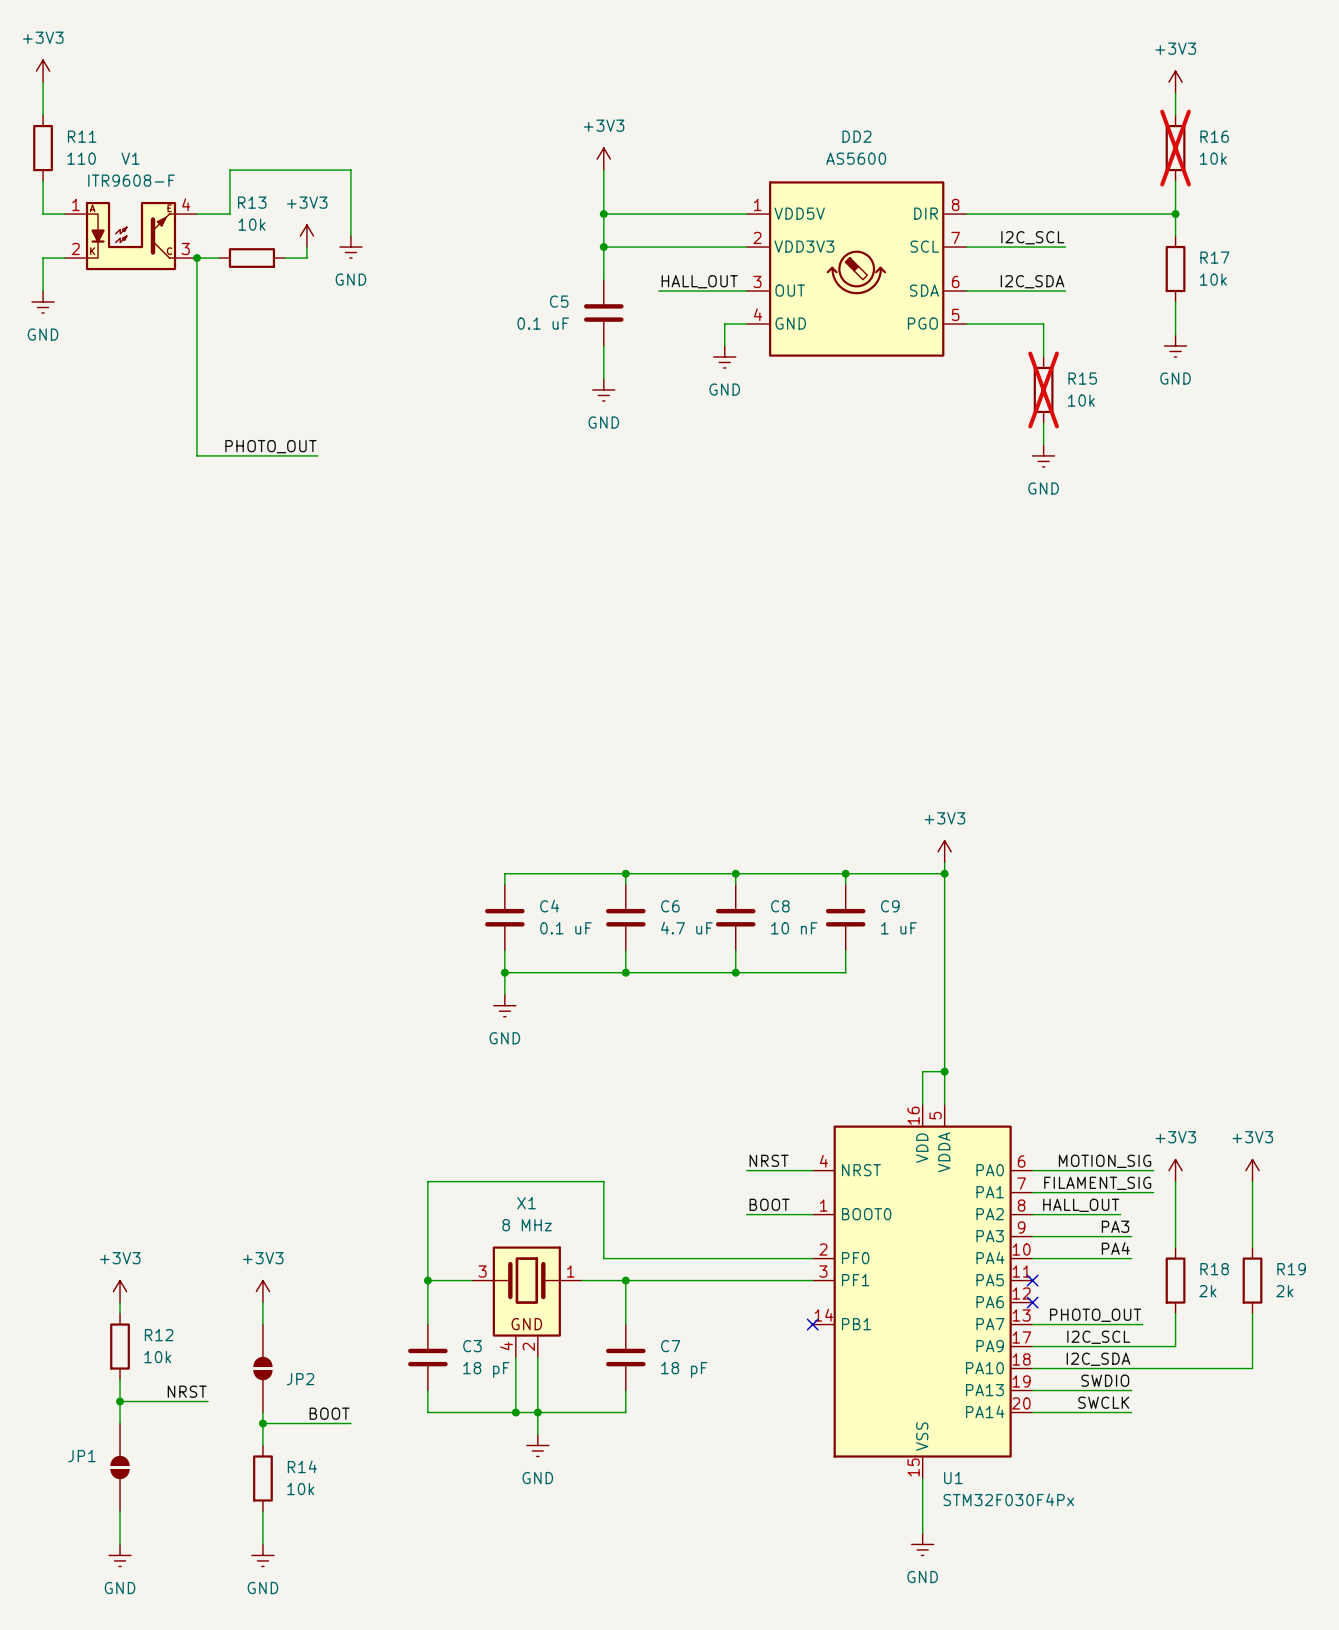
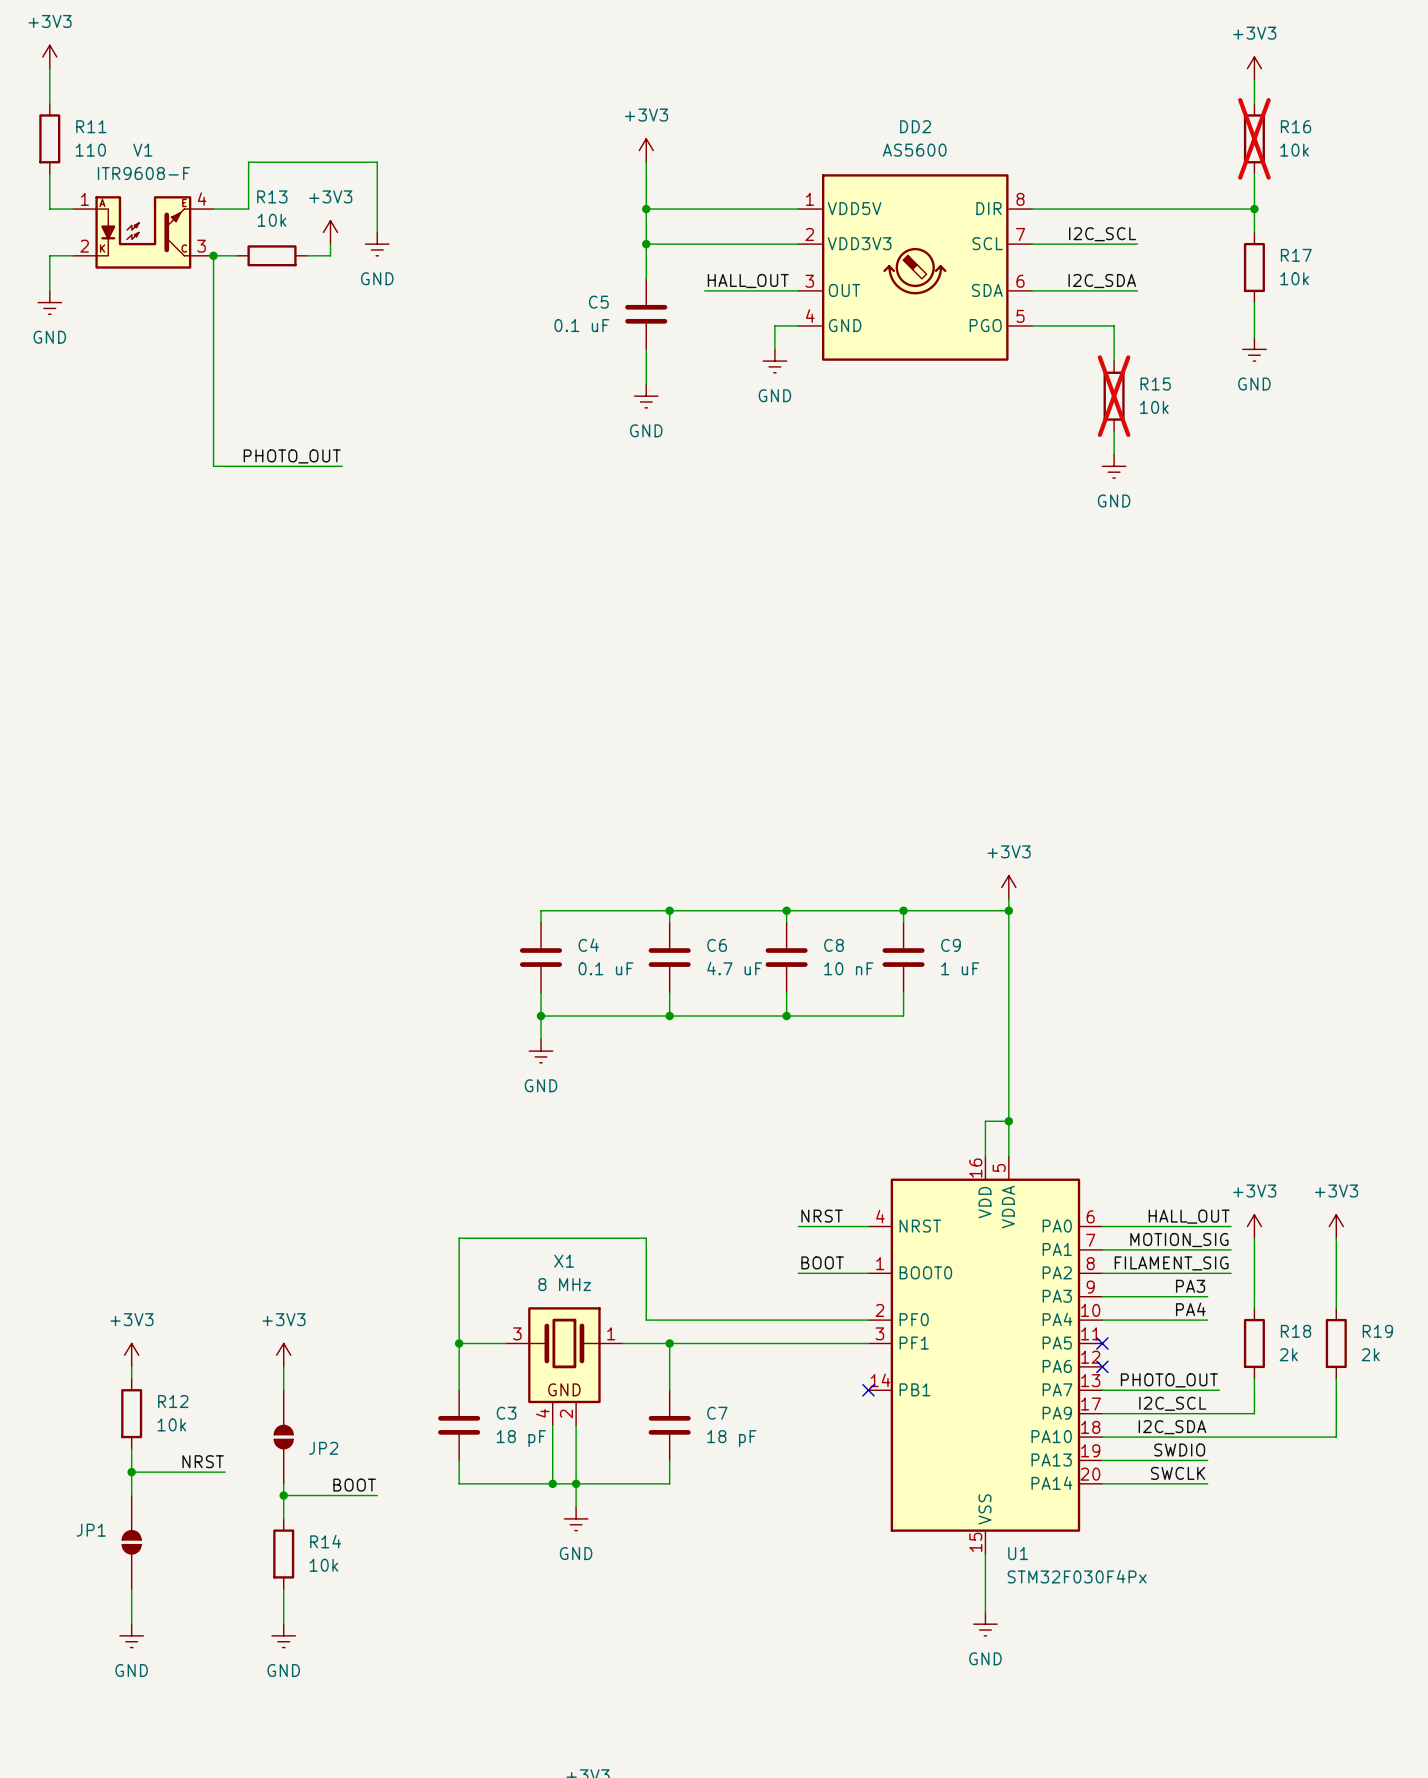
label: MOTION_SIG (1105, 1161) -> HALL_OUT (1189, 1216)
label: FILAMENT_SIG (1097, 1183) -> MOTION_SIG (1179, 1240)
label: HALL_OUT (1081, 1205) -> none
label: none -> FILAMENT_SIG (1171, 1263)
wire: none -> (1195, 1273) (1231, 1273)

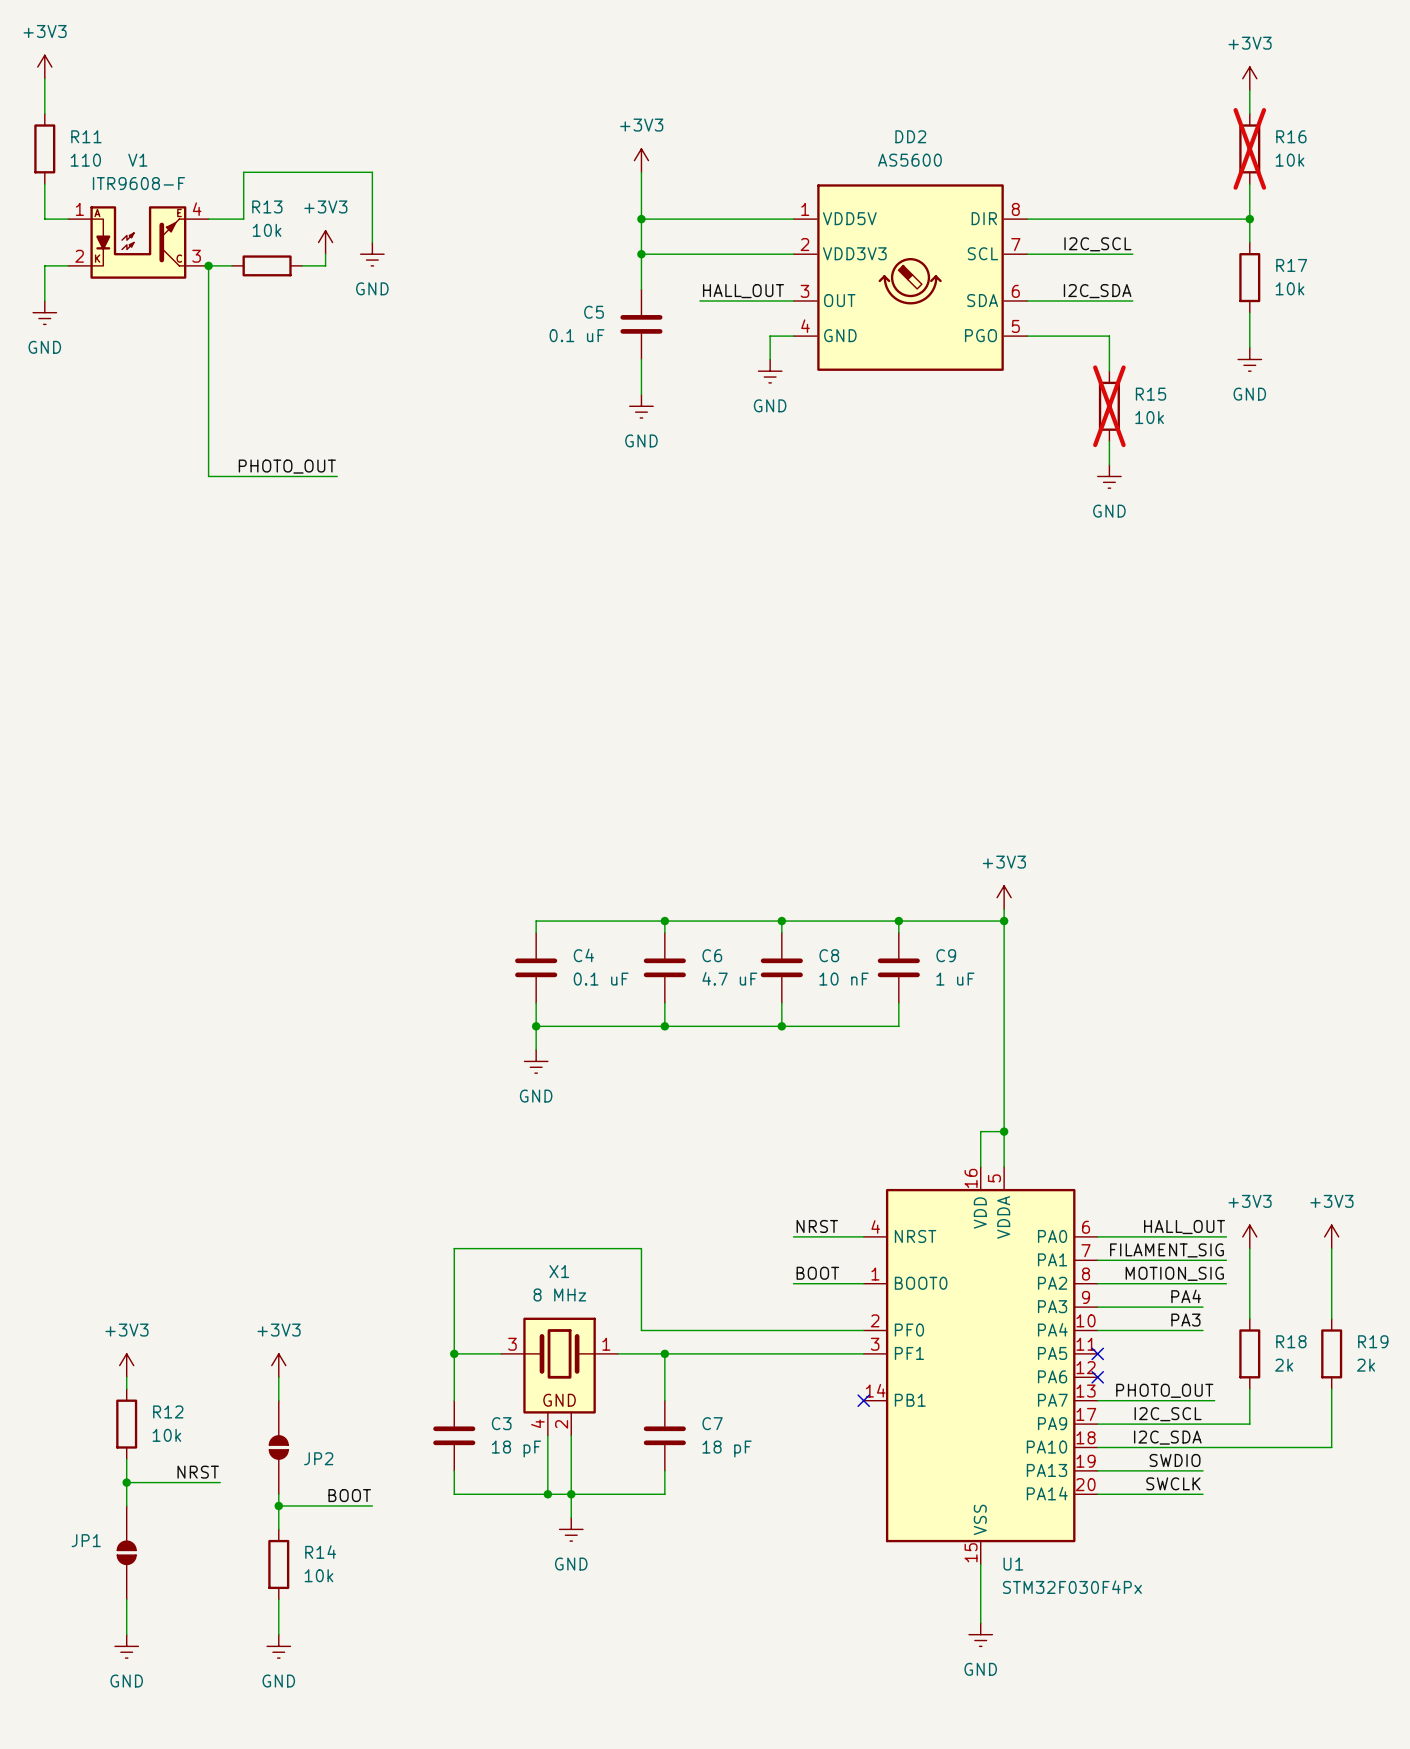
label: MOTION_SIG (1179, 1240) -> FILAMENT_SIG (1166, 1250)
label: FILAMENT_SIG (1171, 1263) -> MOTION_SIG (1174, 1273)
label: PA3 (1190, 1286) -> PA4 (1186, 1296)
label: PA4 (1190, 1309) -> PA3 (1185, 1320)

